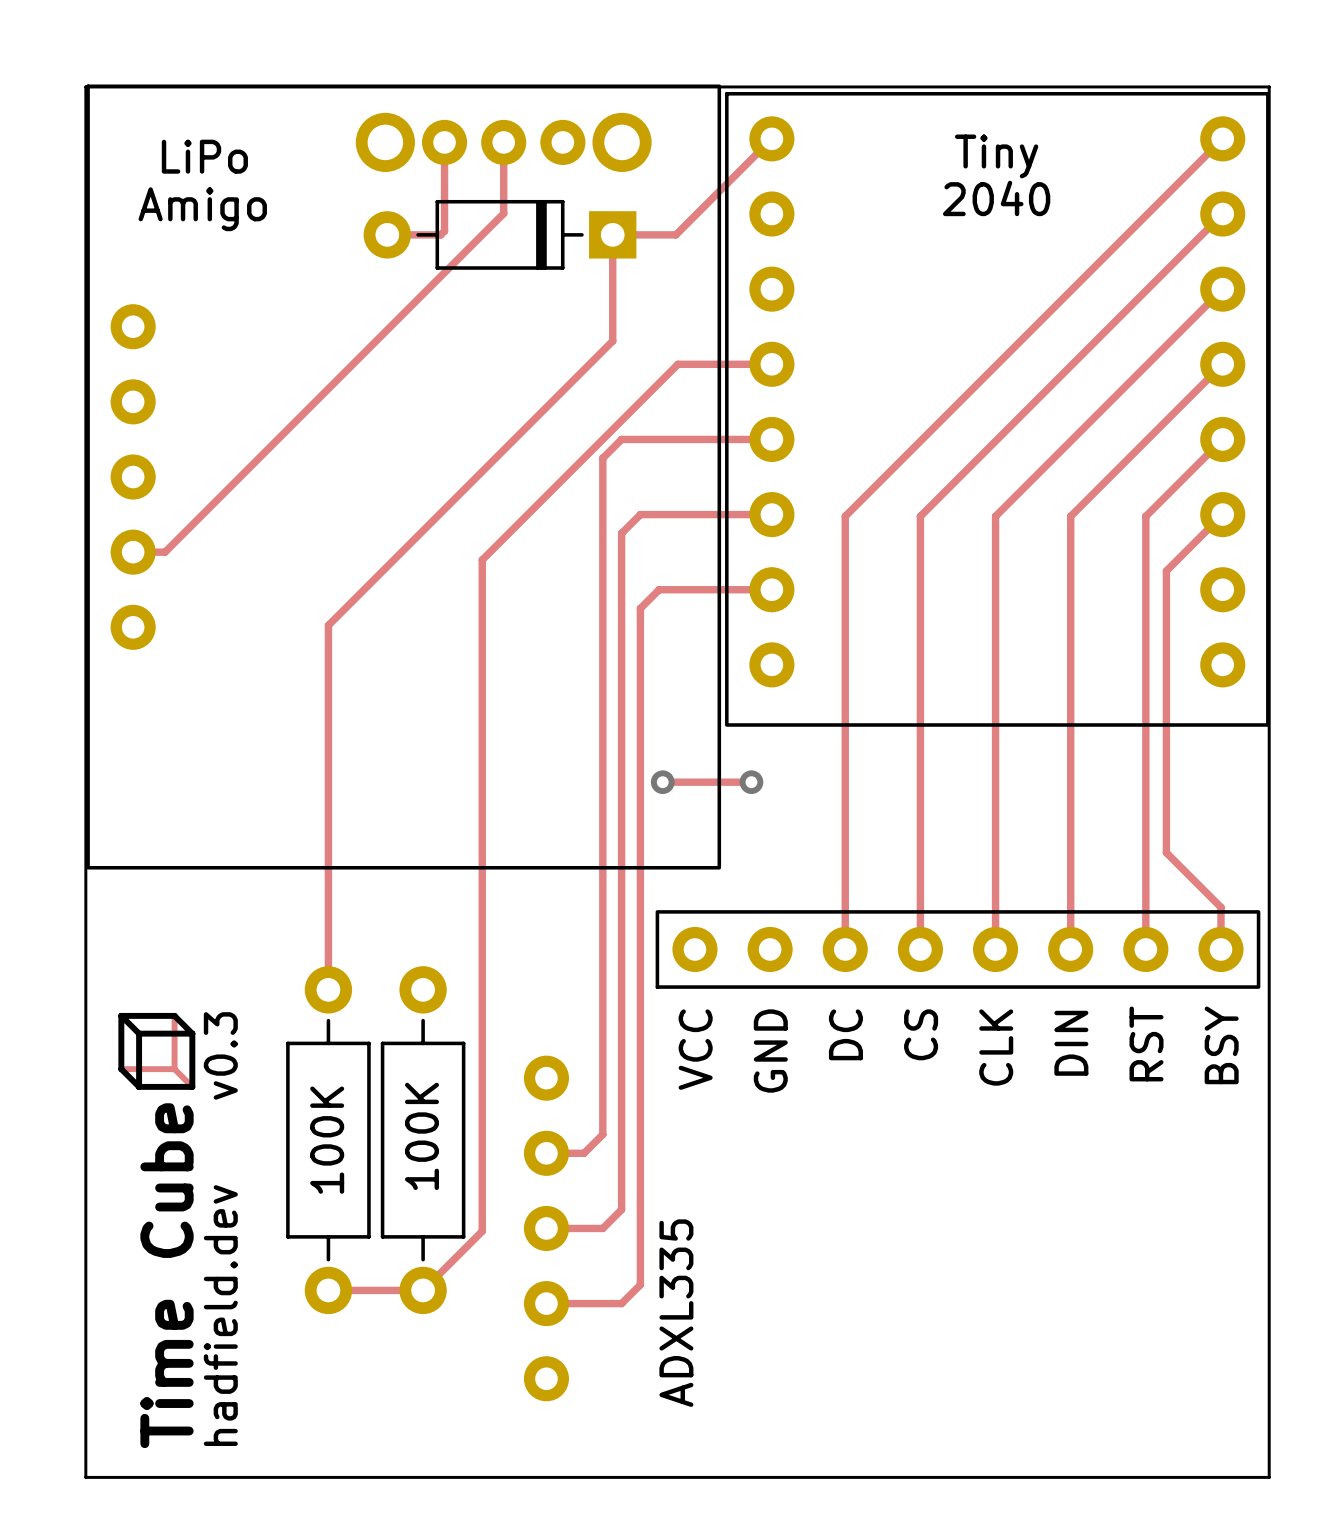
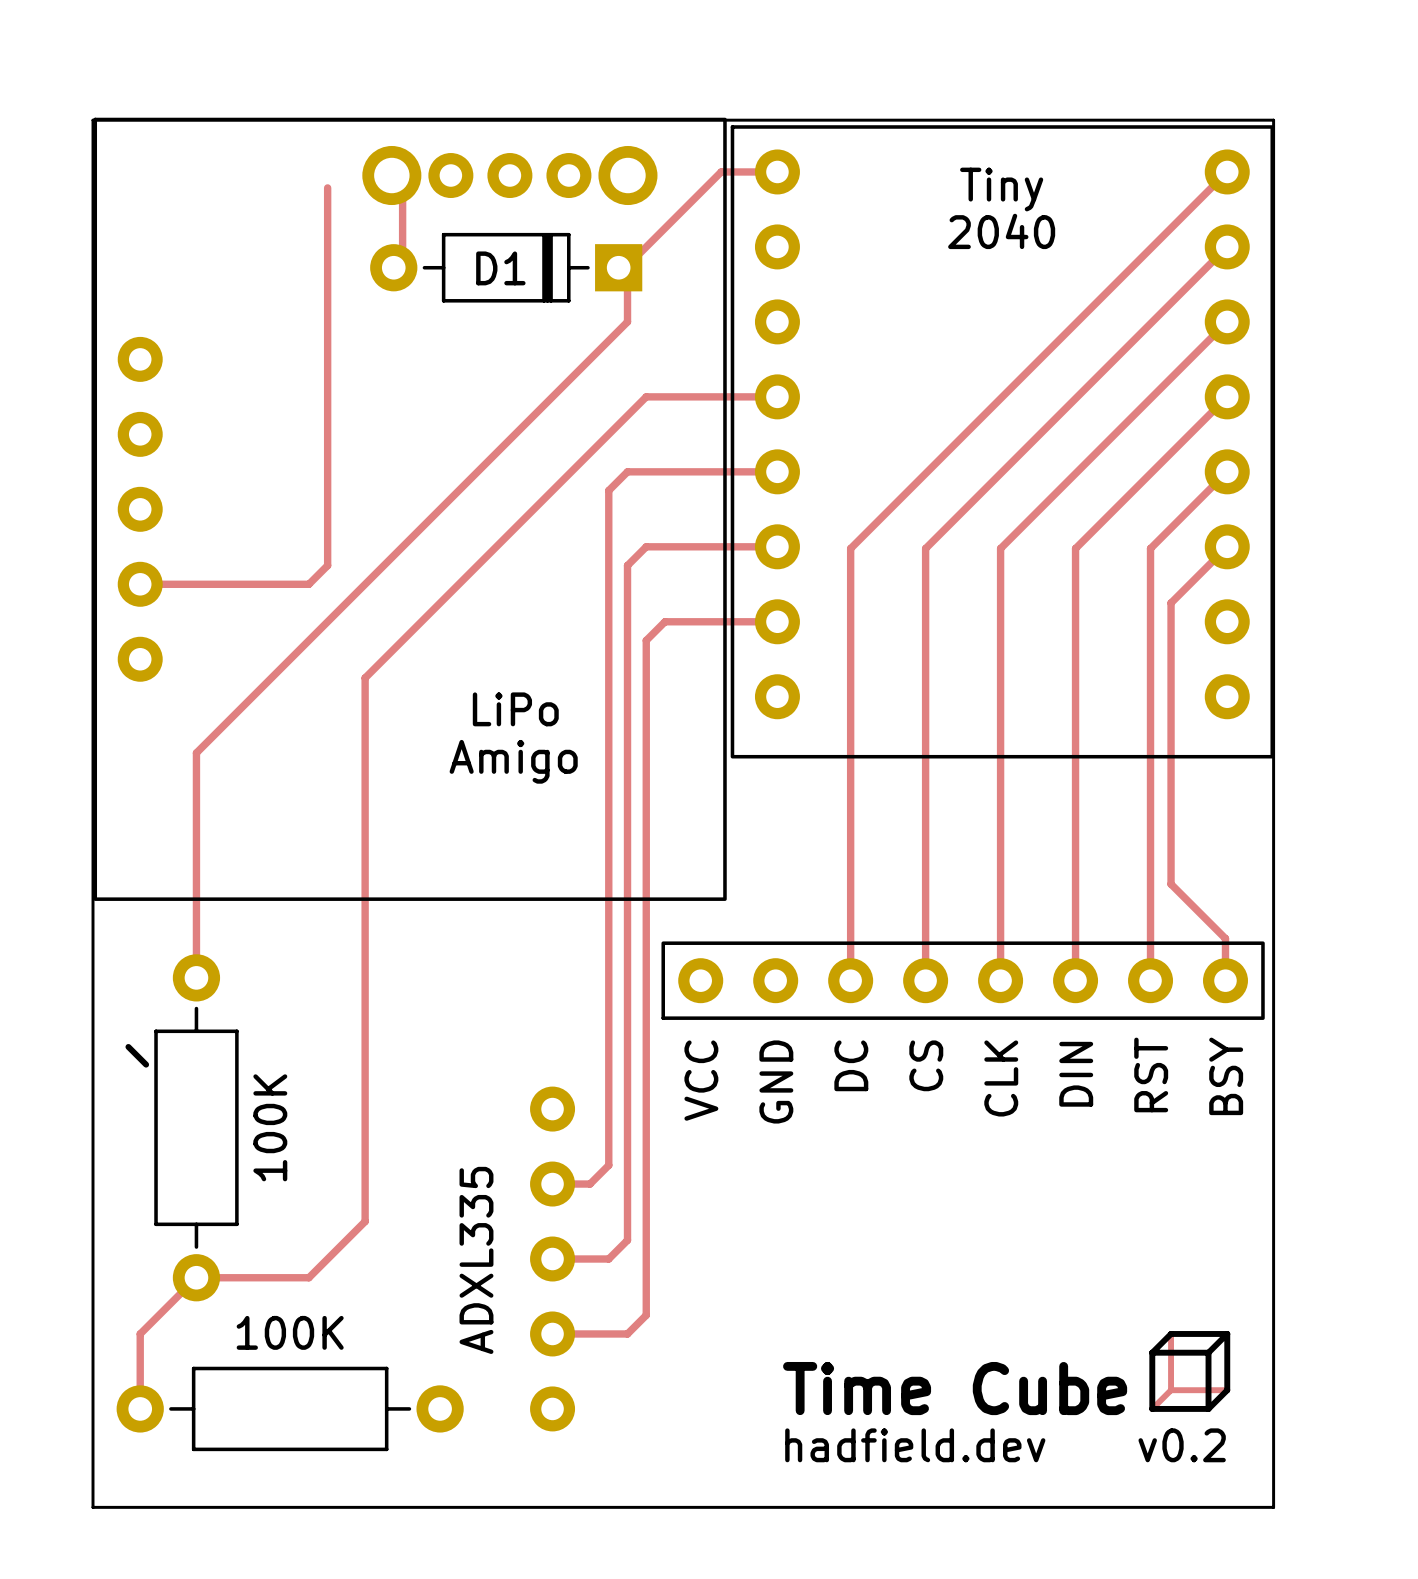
track: (771, 138) (675, 234) (612, 234) (612, 341) (328, 625) (328, 989) -> (777, 171) (721, 171) (627, 265) (627, 321) (196, 752) (196, 977)
track: (444, 142) (444, 231) (440, 234) (387, 234) -> none
track: (503, 142) (503, 213) (165, 552) -> (327, 187) (327, 565) (308, 584) (172, 584)
track: none -> (402, 187) (402, 265)
text position: LiPo (204, 156) -> LiPo (515, 709)
text position: Amigo (202, 209) -> Amigo (513, 761)
D1 name: none -> D1 (500, 268)
track: (677, 364) (482, 559) (482, 1231) (423, 1290) (328, 1290) -> (683, 396) (646, 396) (365, 678) (365, 1221) (308, 1277) (196, 1277) (140, 1333) (140, 1408)
track: (662, 782) (751, 782) -> none
via: (662, 782) -> none
via: (751, 782) -> none
track: (174, 1015) (174, 1069) -> none
line: (192, 1033) (174, 1015) (121, 1015) (121, 1069) (139, 1086) -> none
line: (192, 1033) (139, 1033) (139, 1086) -> none
line: (192, 1033) (192, 1086) (139, 1086) -> none
text: v0.3 (220, 1055) -> none
track: (121, 1069) (174, 1069) -> none
track: (174, 1069) (192, 1086) -> none
part: none -> 100K (196, 1127)
part: 100K (328, 1140) -> none
part: 100K (423, 1140) -> none
text rotation: 0° (167, 1275) -> 90° clockwise (955, 1388)
text position: Time Cube (167, 1275) -> Time Cube (955, 1388)
track: none -> (1171, 1333) (1171, 1390)
line: none -> (1227, 1333) (1208, 1352)
line: none -> (1227, 1333) (1227, 1390) (1208, 1408)
line: none -> (1227, 1333) (1171, 1333) (1152, 1352)
text position: ADXL335 (676, 1313) -> ADXL335 (476, 1260)
text rotation: 0° (220, 1315) -> 90° clockwise (915, 1445)
text position: hadfield.dev (220, 1315) -> hadfield.dev (915, 1445)
line: none -> (1152, 1352) (1208, 1352)
line: none -> (1152, 1352) (1152, 1408) (1208, 1408)
line: none -> (1208, 1352) (1208, 1408)
track: none -> (1171, 1390) (1152, 1408)
track: none -> (1171, 1390) (1227, 1390)
part: none -> 100K (290, 1408)
text: none -> v0.2 (1182, 1445)

